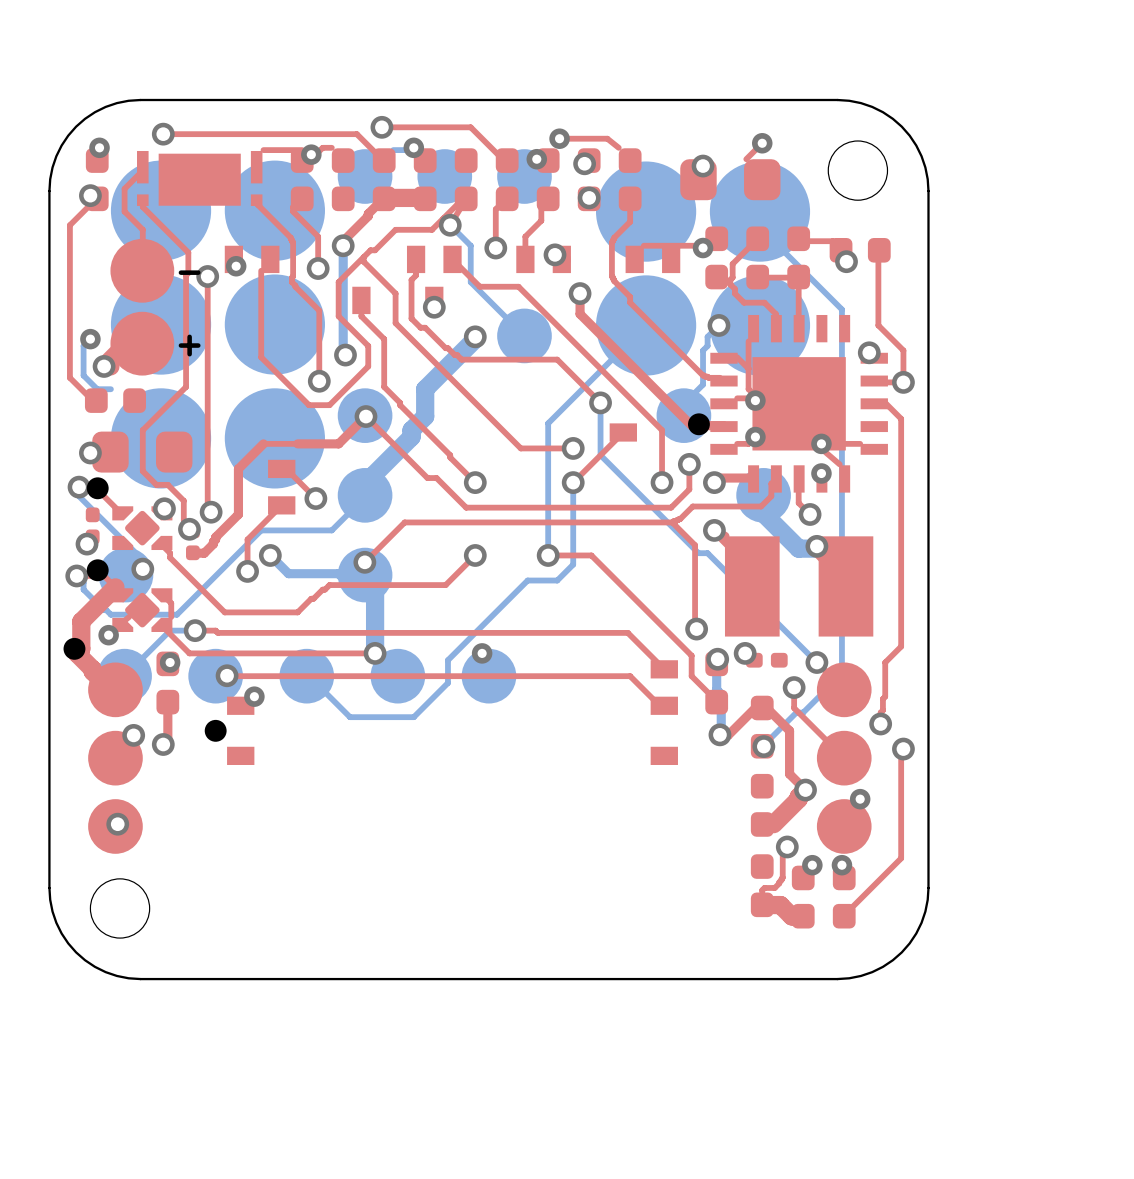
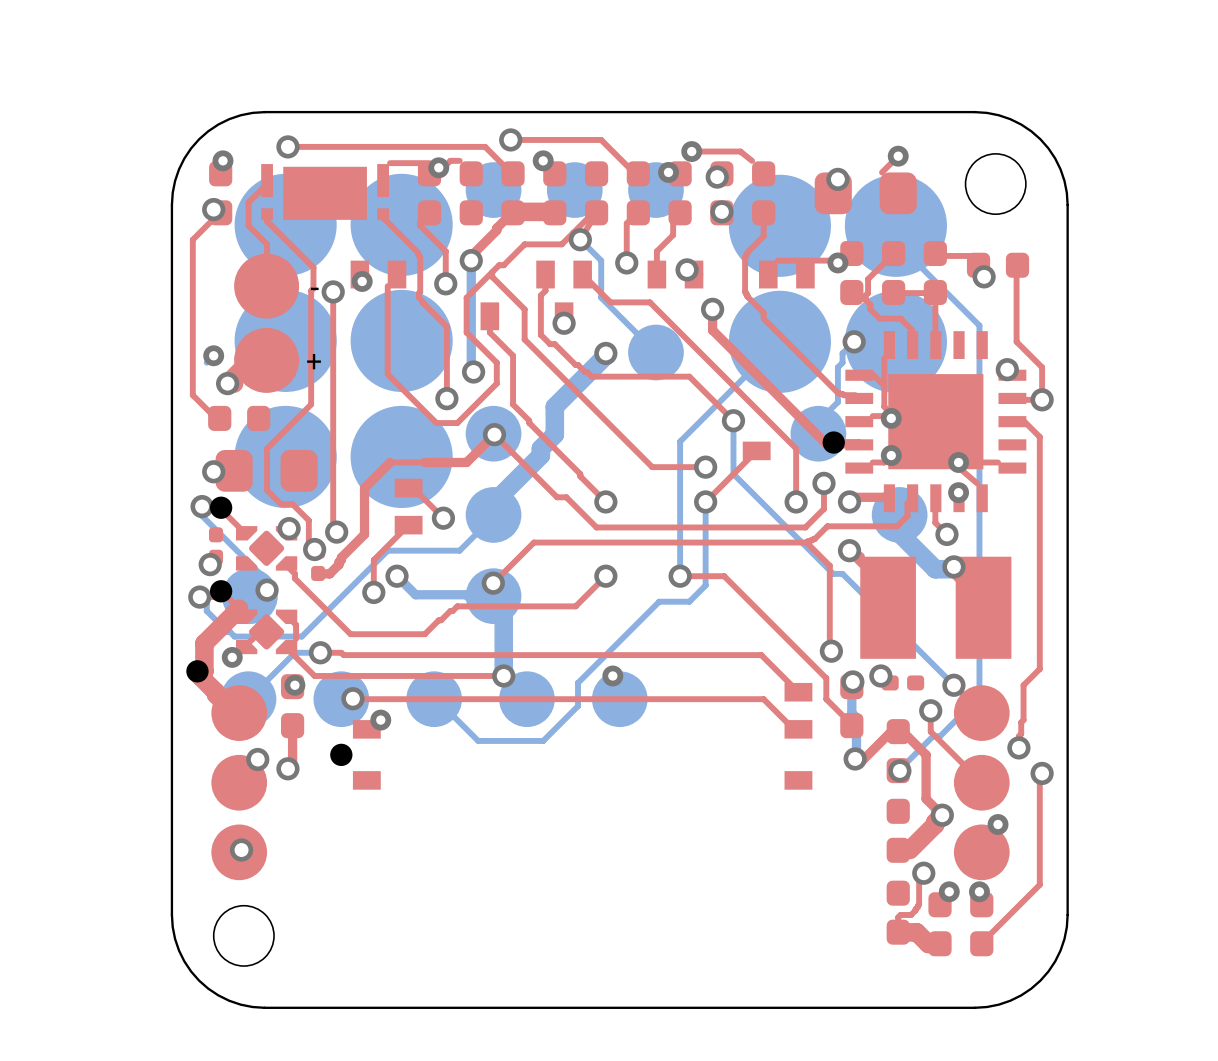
bottom track: (393, 150) (406, 150) -> none
bottom track: (83, 345) (83, 375) (97, 389) (110, 389) -> none

